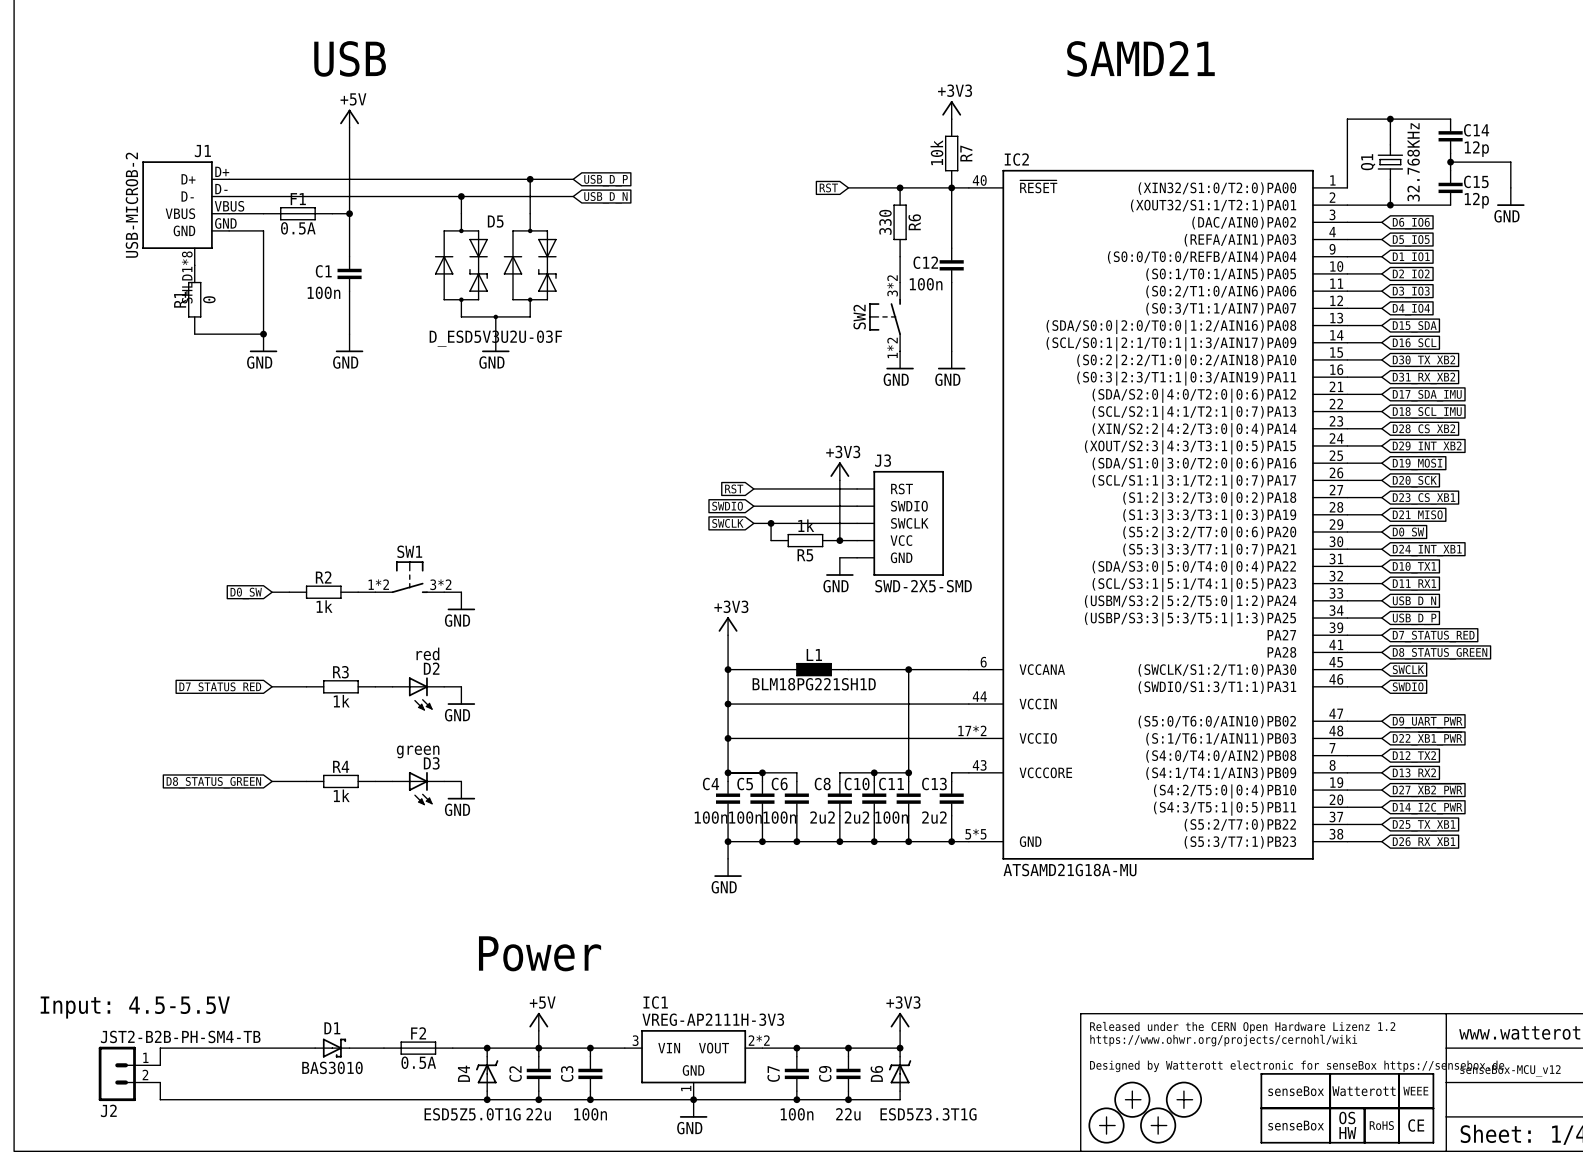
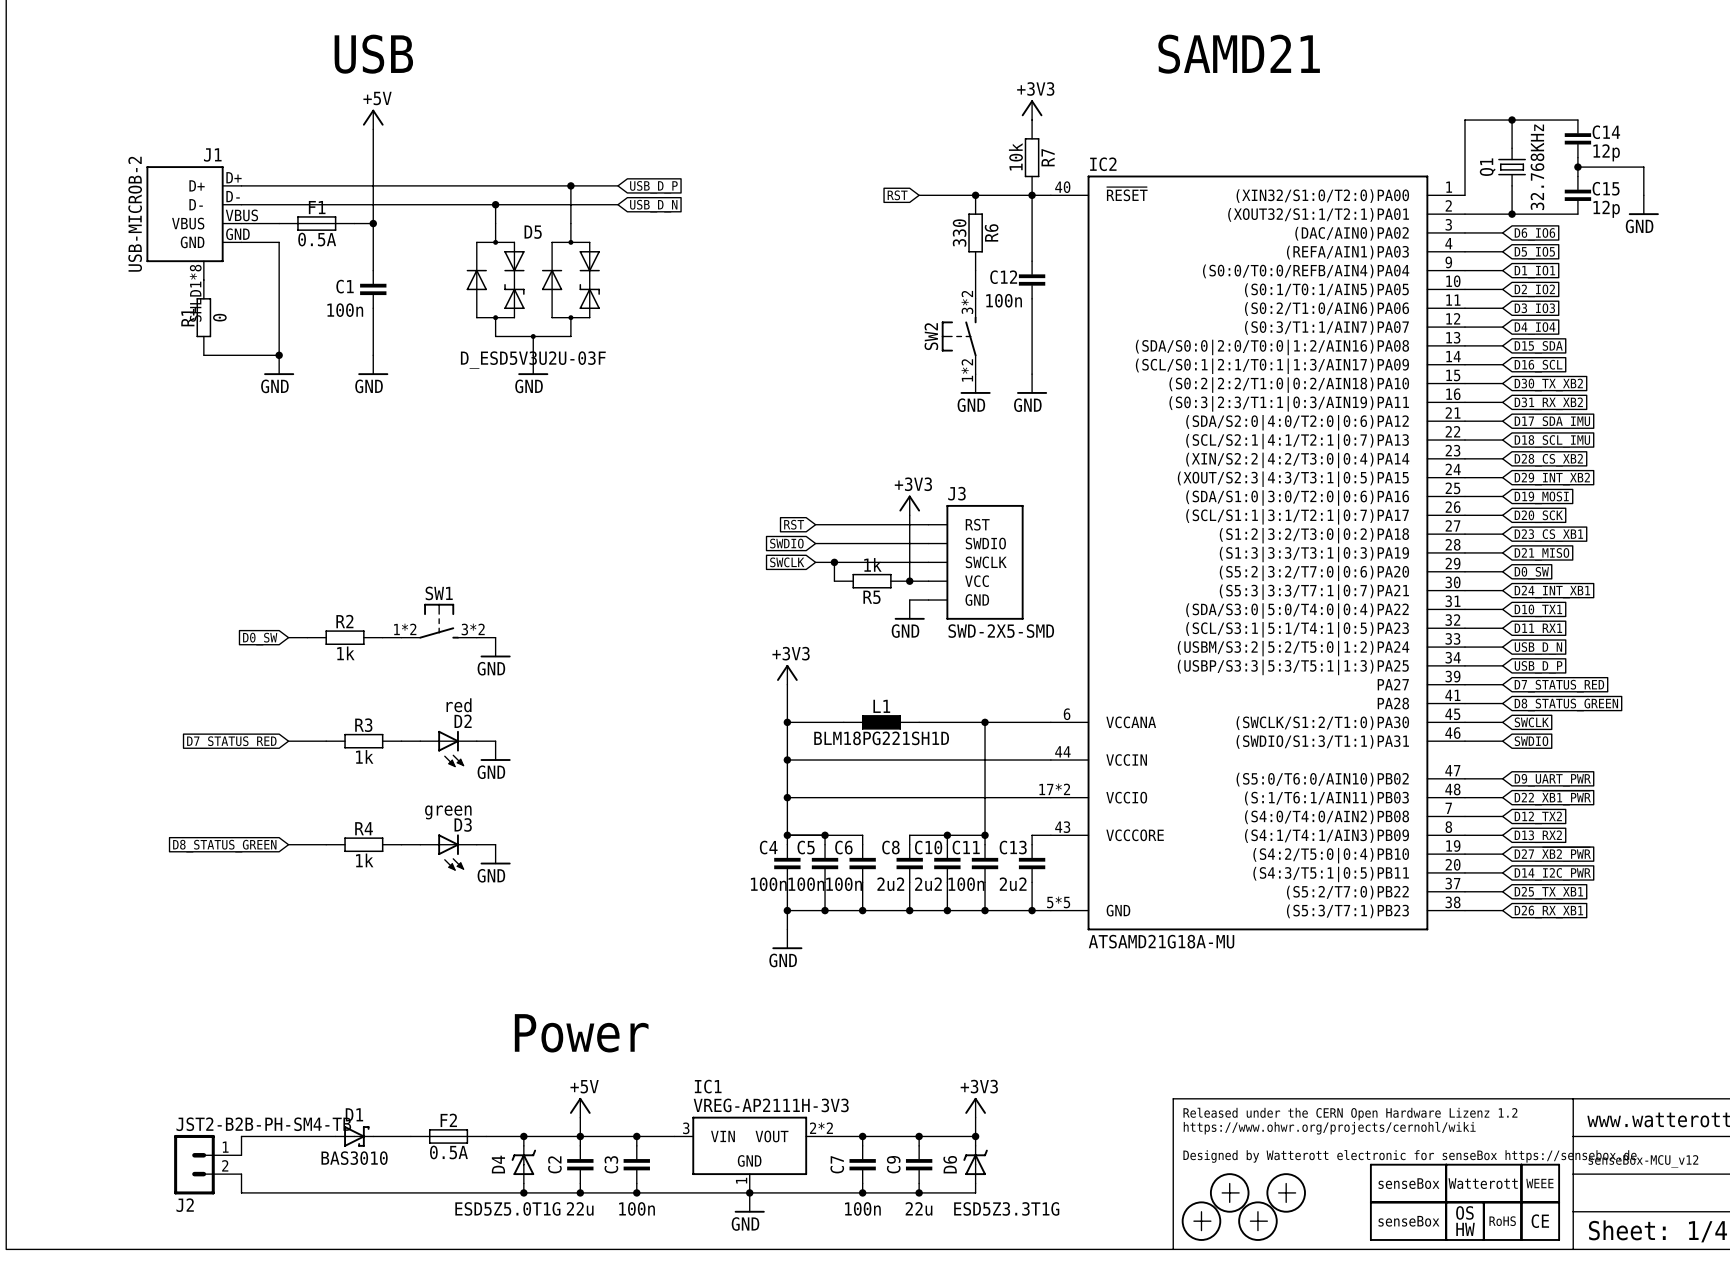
text: Input: 4.5-5.5V (135, 1007) -> none
wire: (229, 1048) (160, 1048) (160, 1065) -> (241, 1136) (241, 1155)
J2 position: (129, 1073) -> (207, 1164)
wire: (160, 1082) (160, 1099) (229, 1099) -> (241, 1174) (241, 1192)

